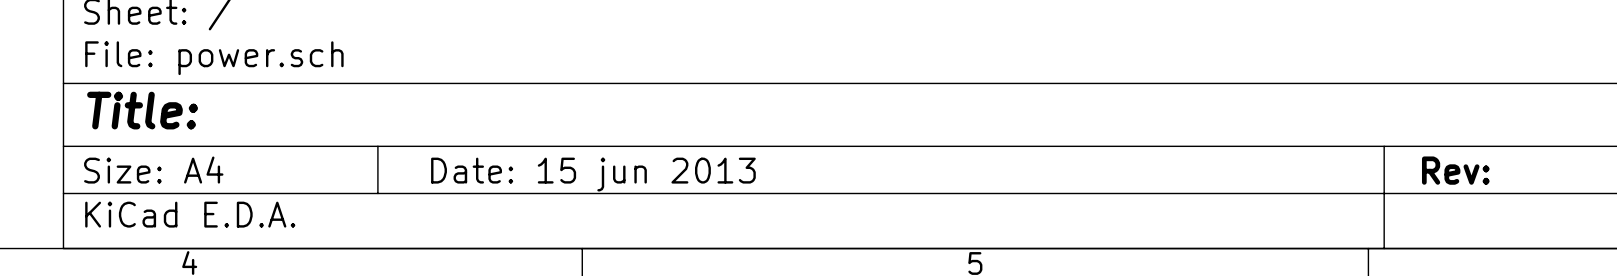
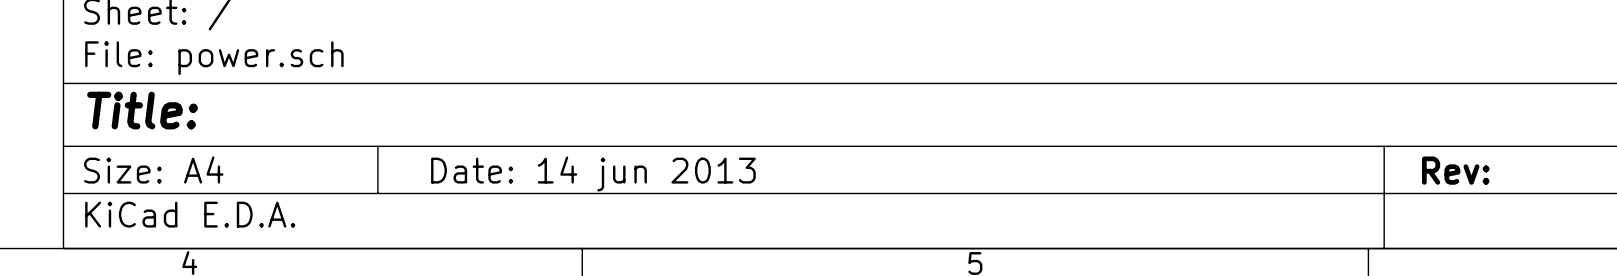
title block: Date: 15 jun 2013 (593, 174) -> Date: 14 jun 2013 (593, 173)

